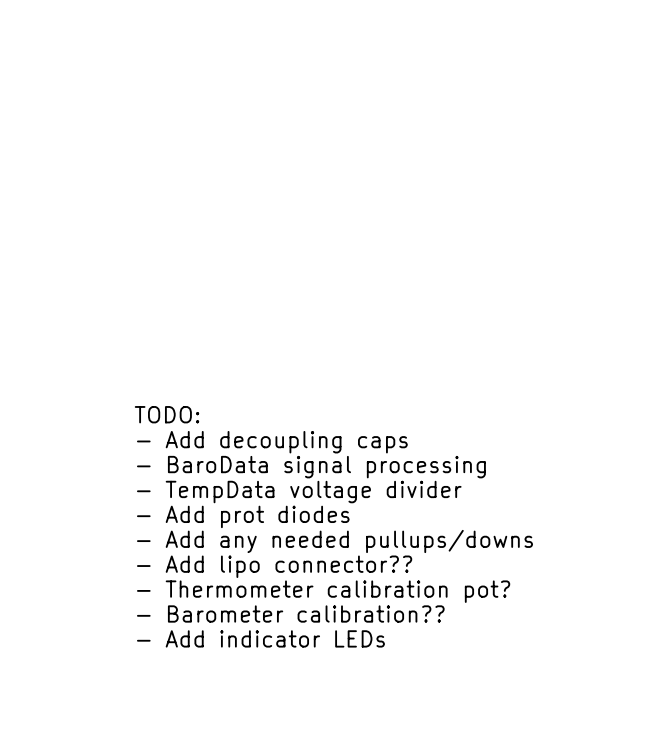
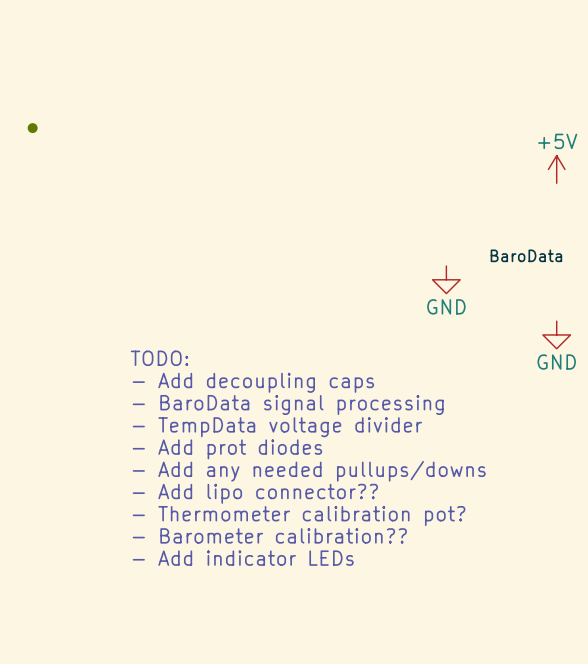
junction: none -> (32, 128)
power symbol: none -> +5V (556, 169)
label: none -> BaroData (526, 255)
power symbol: none -> GND (446, 279)
power symbol: none -> GND (556, 334)

